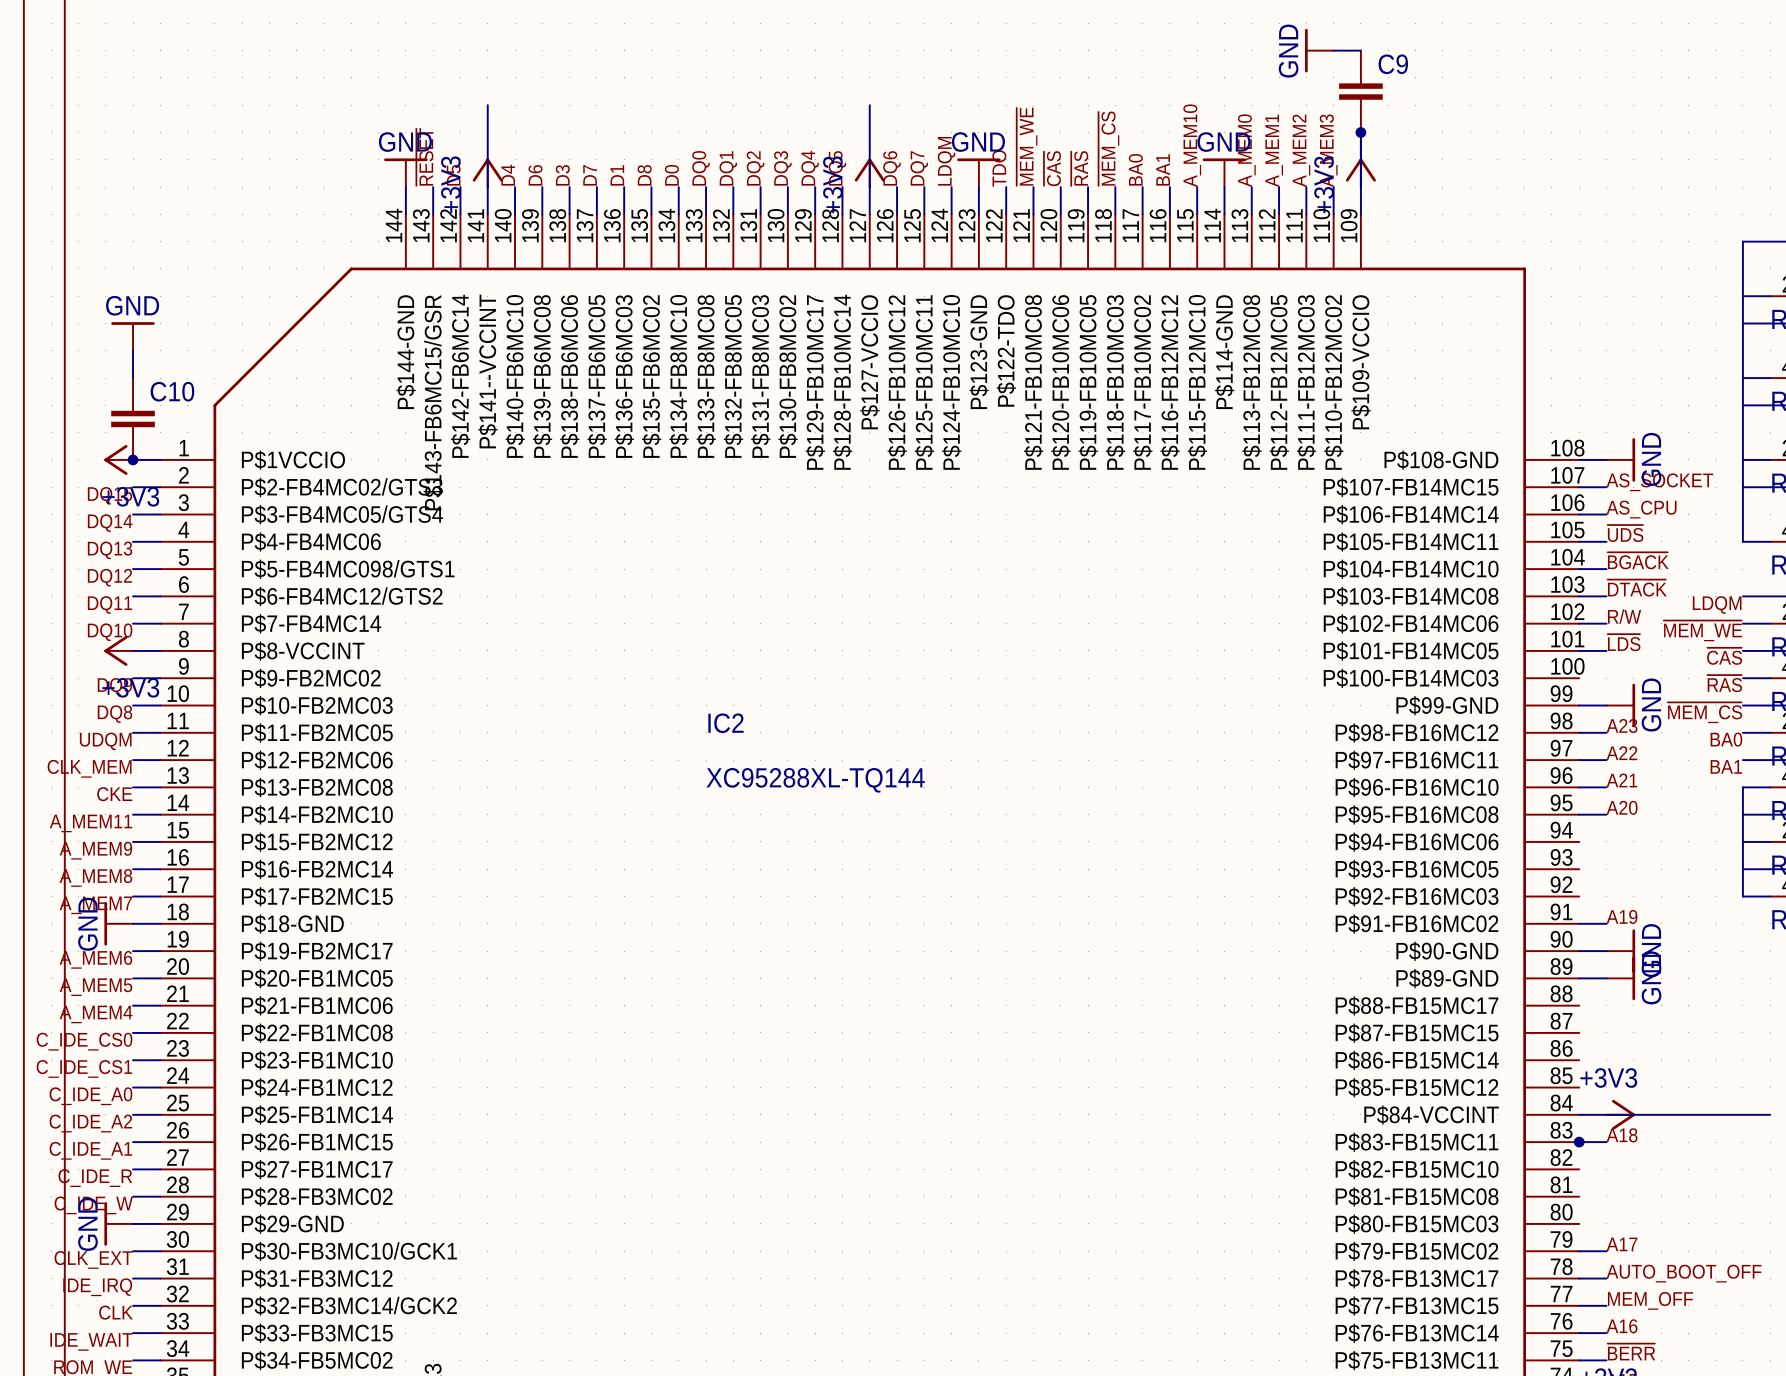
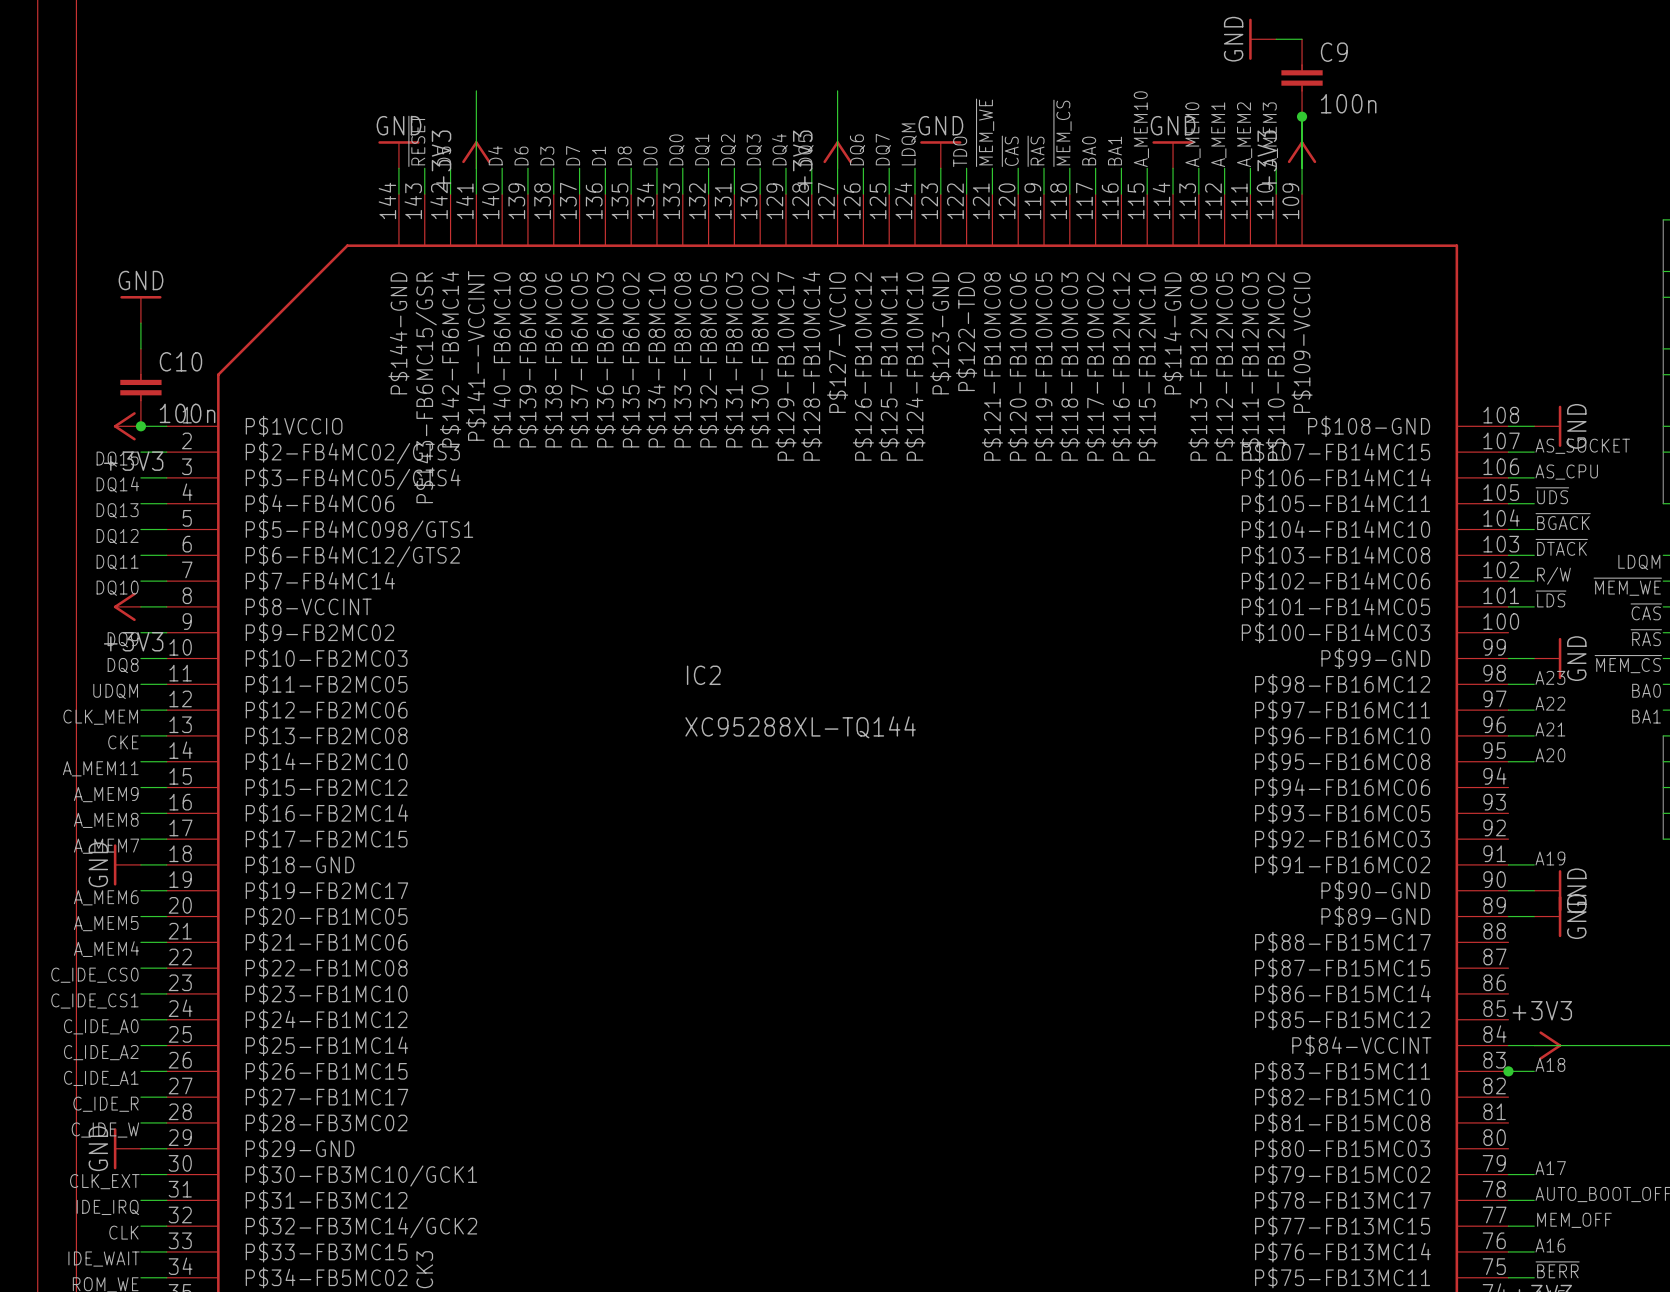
C9 value: none -> 100n (1348, 103)
C10 value: none -> 100n (187, 413)

